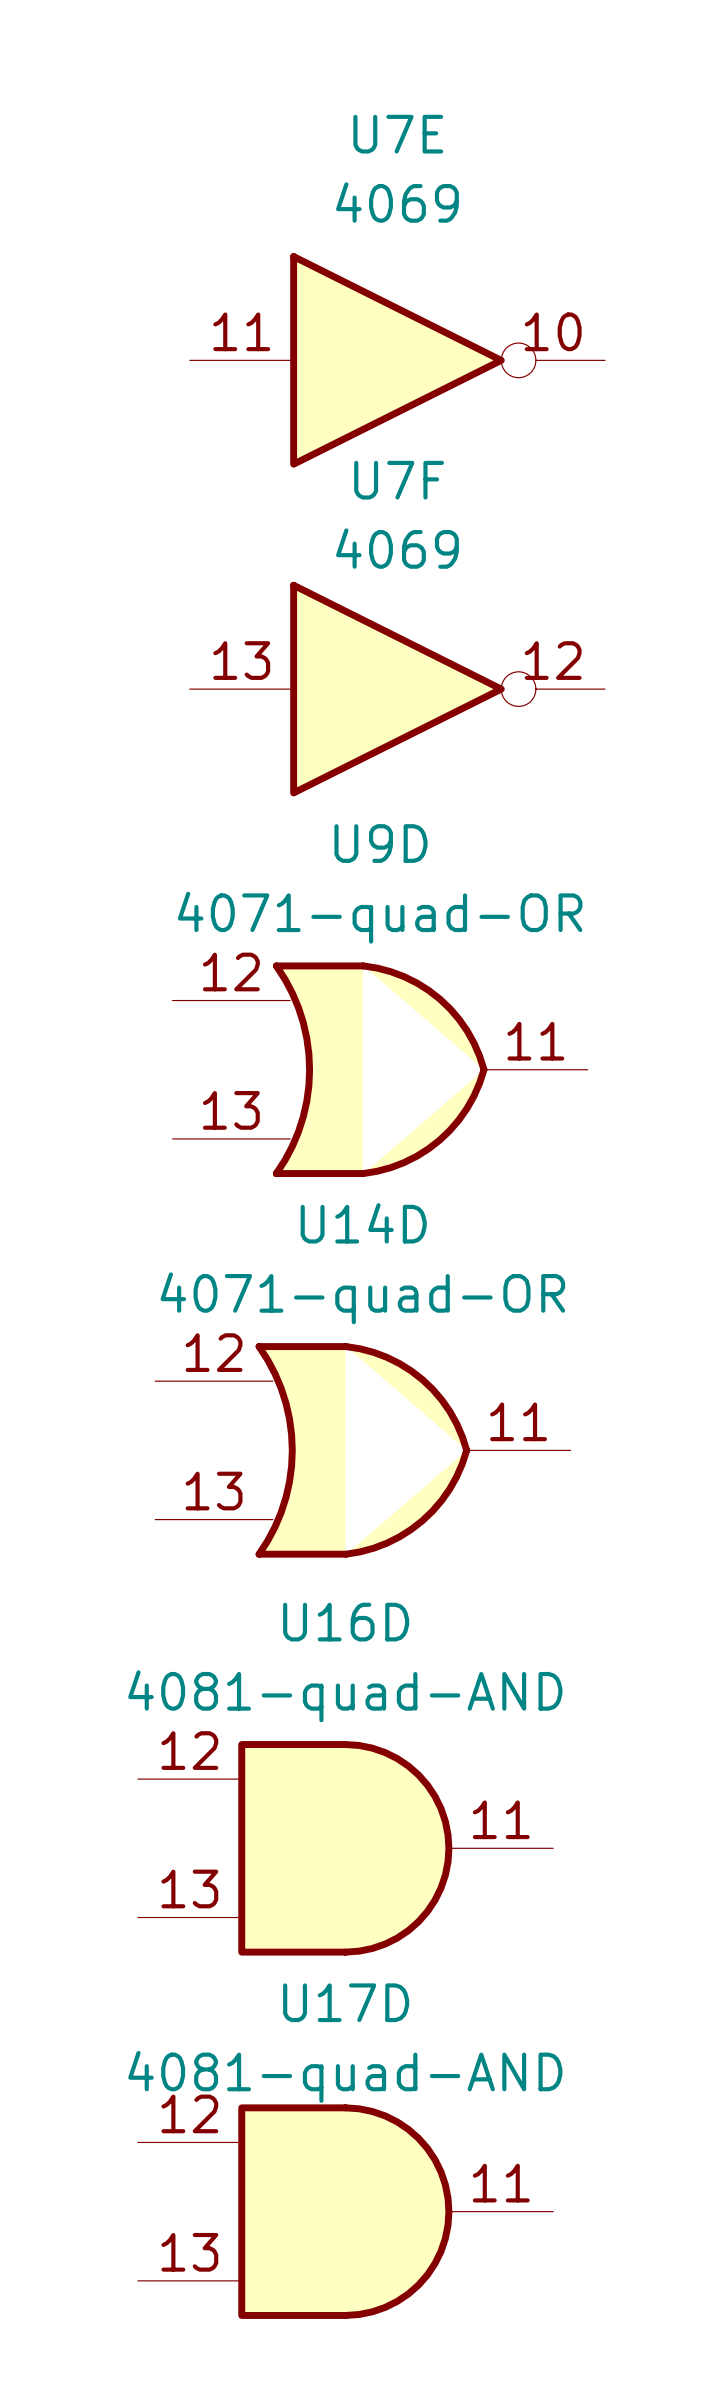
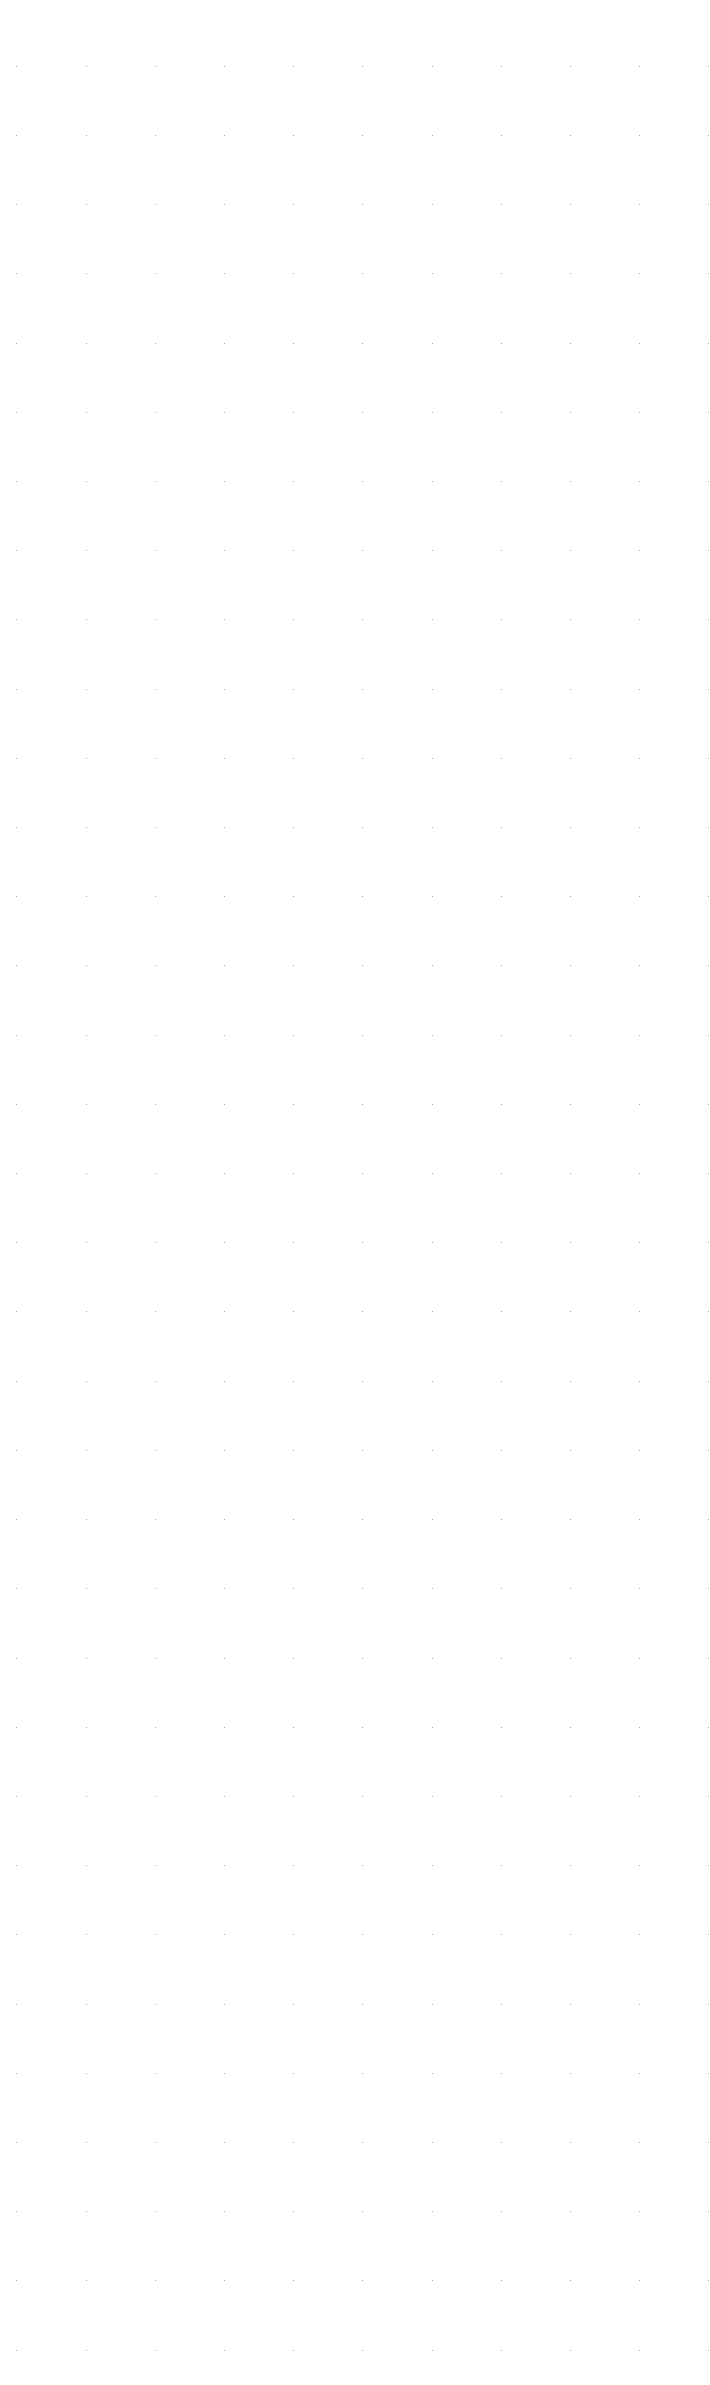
U7E: 4069 (397, 360) -> none
U7F: 4069 (397, 689) -> none
U9D: 4071-quad-OR (380, 1069) -> none
U14D: 4071-quad-OR (362, 1450) -> none
U16D: 4081-quad-AND (345, 1848) -> none
U17D: 4081-quad-AND (345, 2211) -> none

